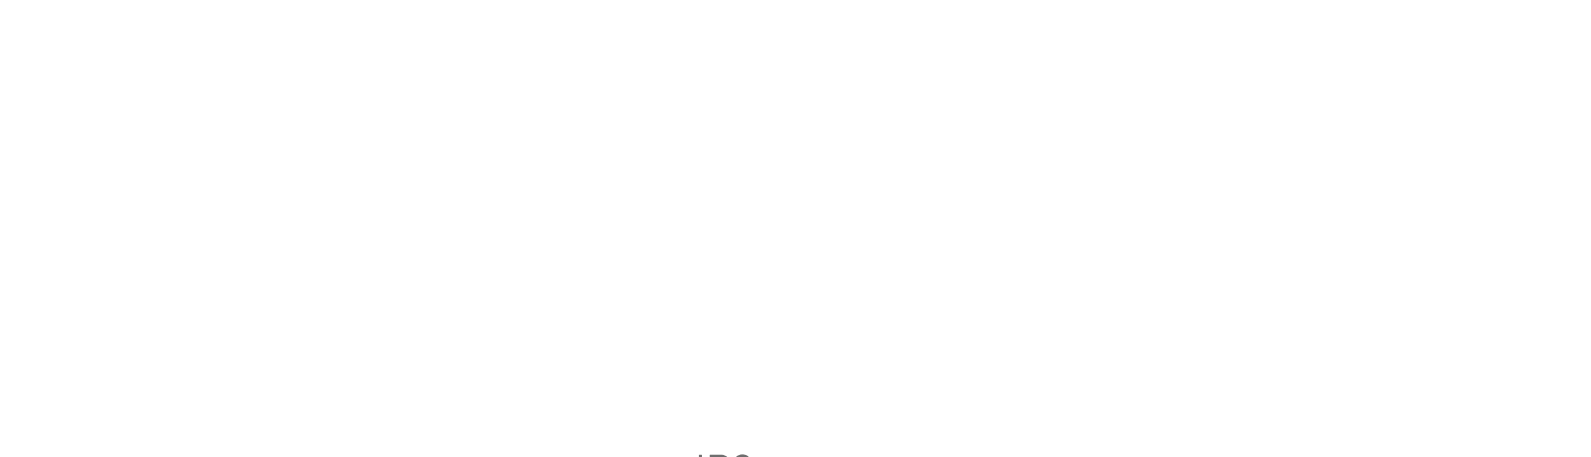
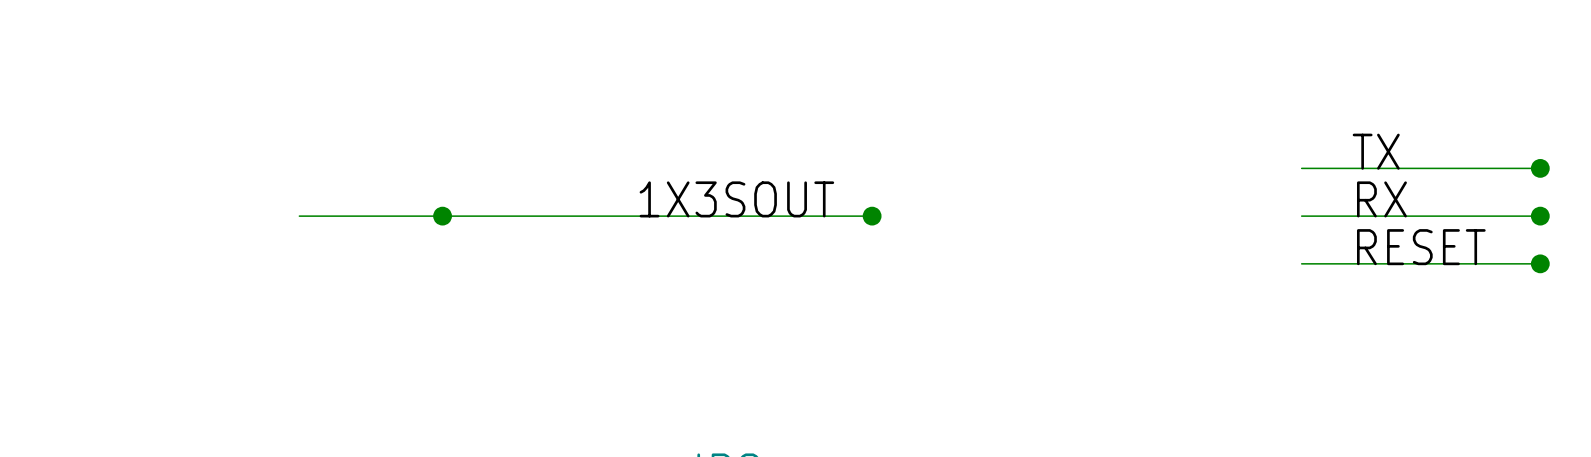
label: none -> TX (1376, 151)
wire: none -> (1301, 168) (1540, 168)
junction: none -> (1540, 168)
label: none -> 1X3SOUT (736, 199)
label: none -> RX (1381, 199)
wire: none -> (299, 216) (872, 216)
junction: none -> (442, 216)
junction: none -> (872, 216)
wire: none -> (1301, 216) (1540, 216)
junction: none -> (1540, 216)
label: none -> RESET (1421, 247)
wire: none -> (1301, 263) (1540, 263)
junction: none -> (1540, 263)

